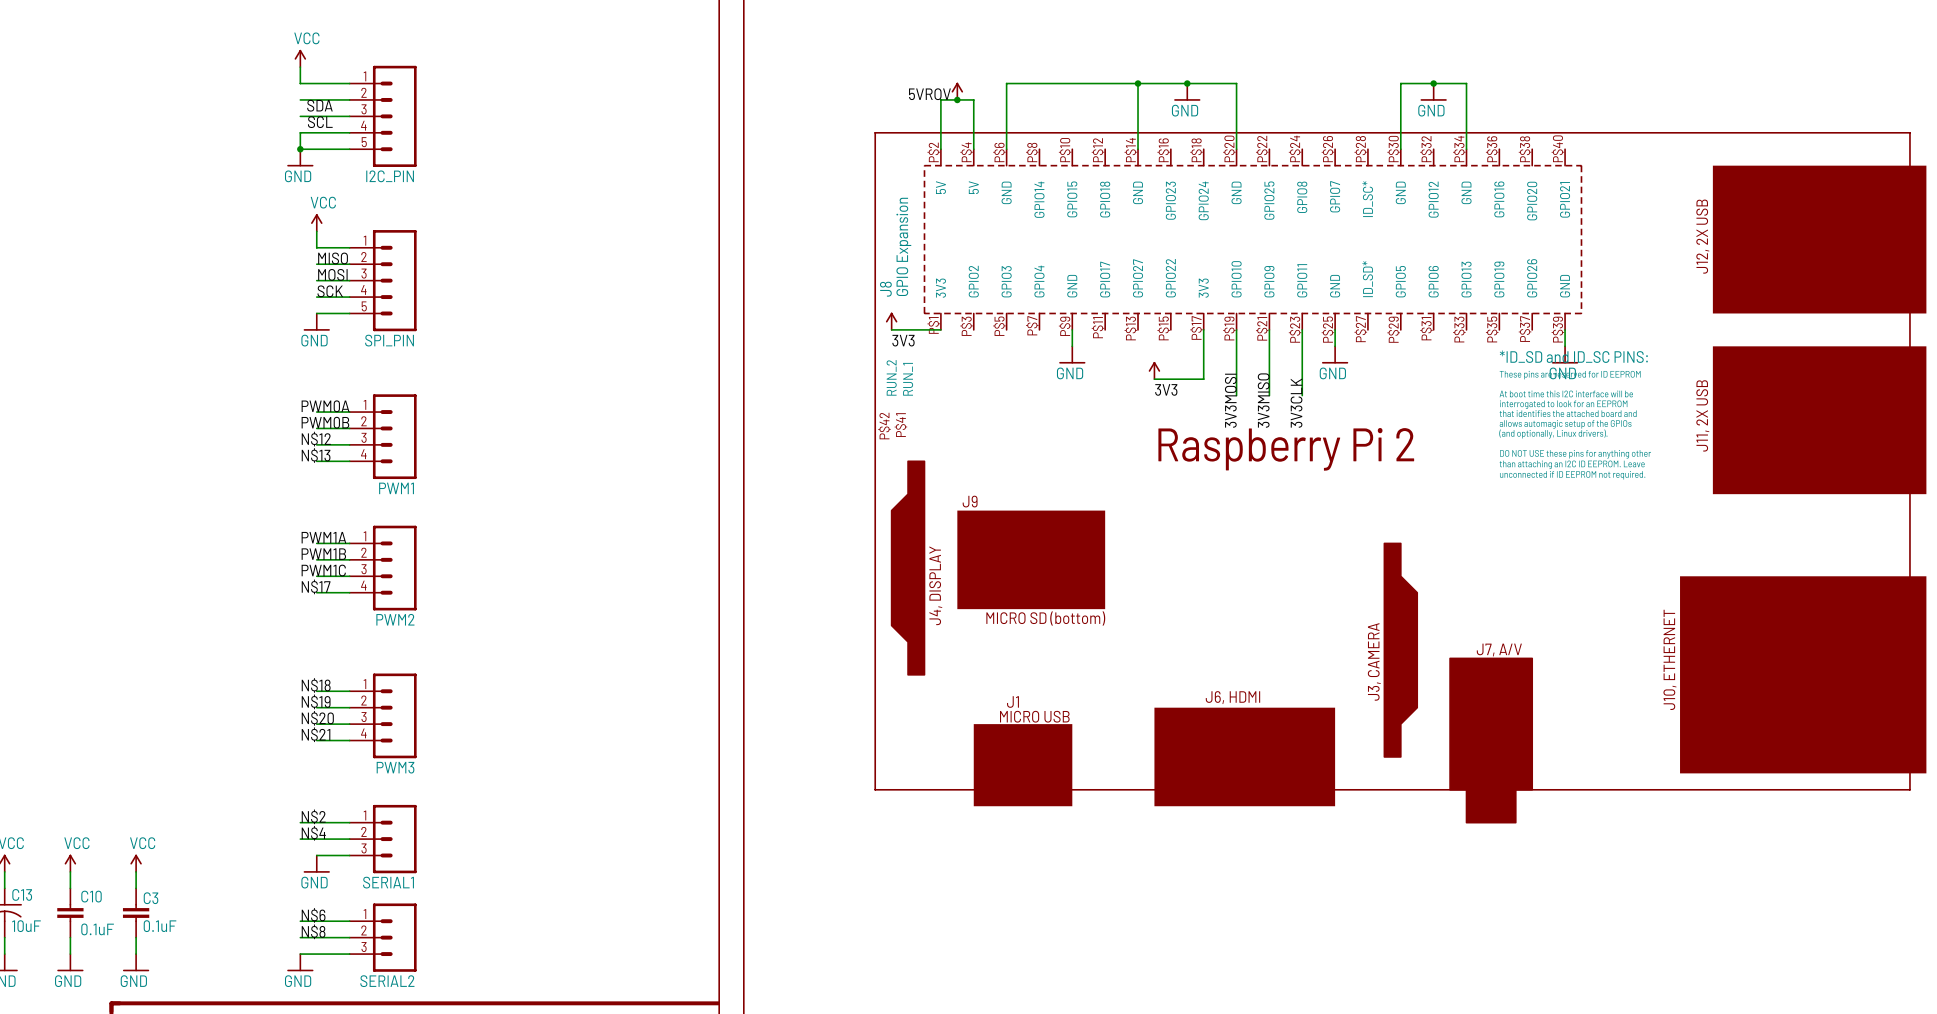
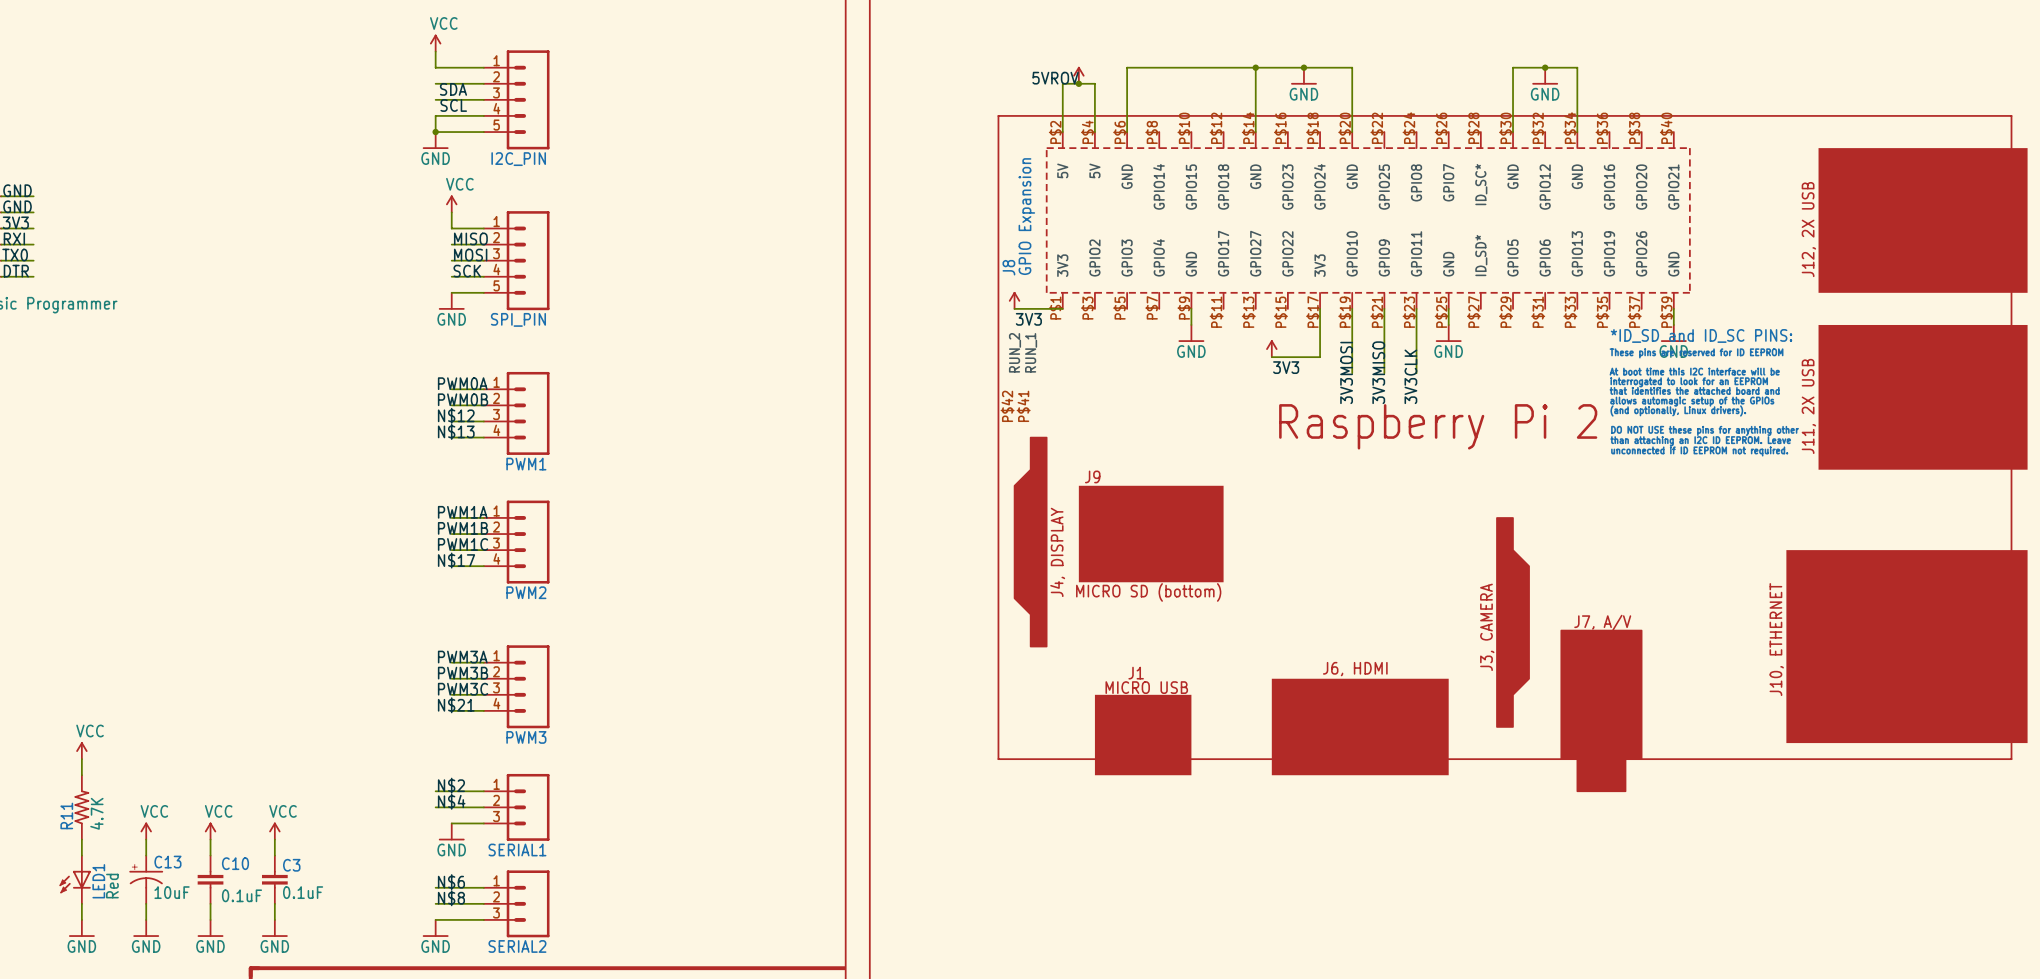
label: N$18 (316, 685) -> PWM3A (462, 657)
label: N$19 (316, 701) -> PWM3B (463, 673)
label: N$20 (317, 718) -> PWM3C (463, 689)

